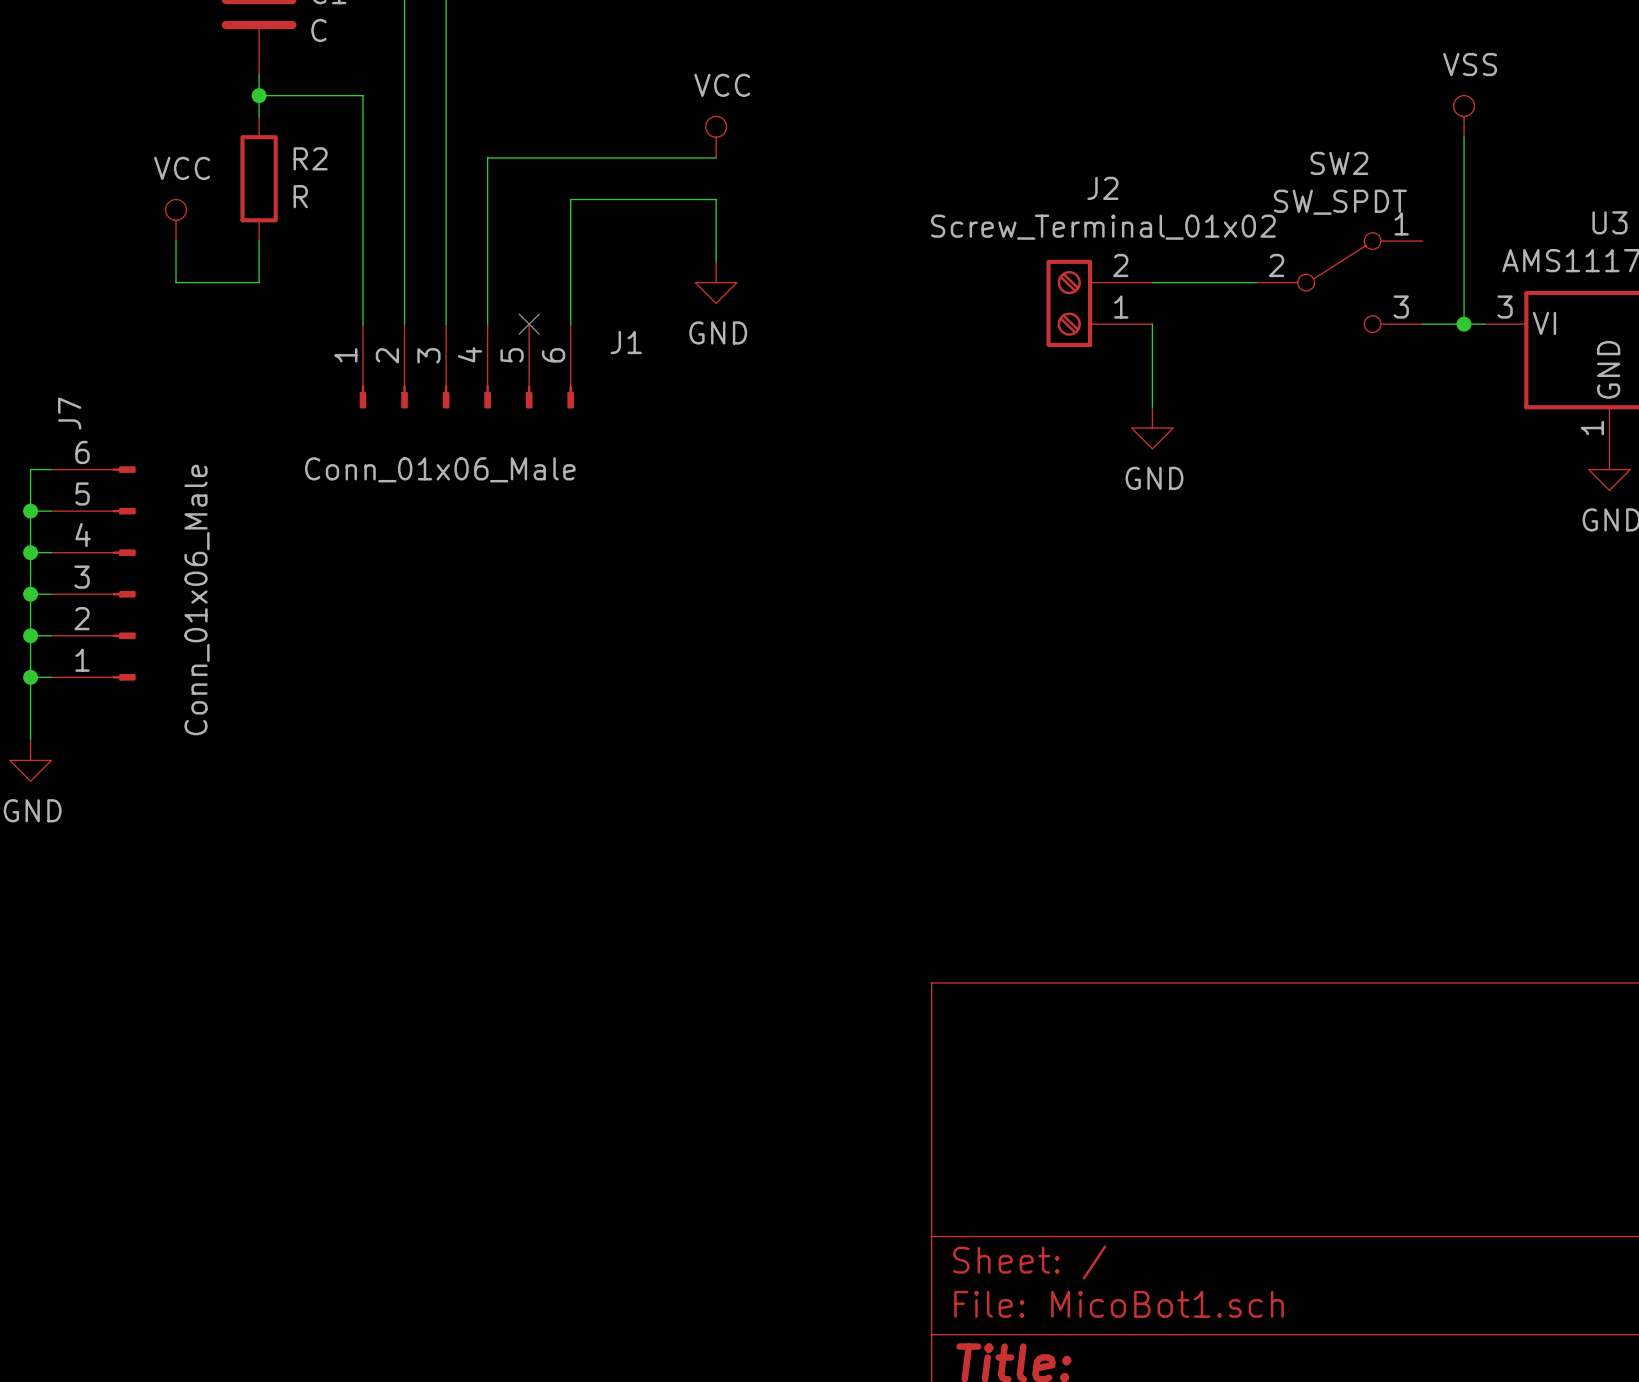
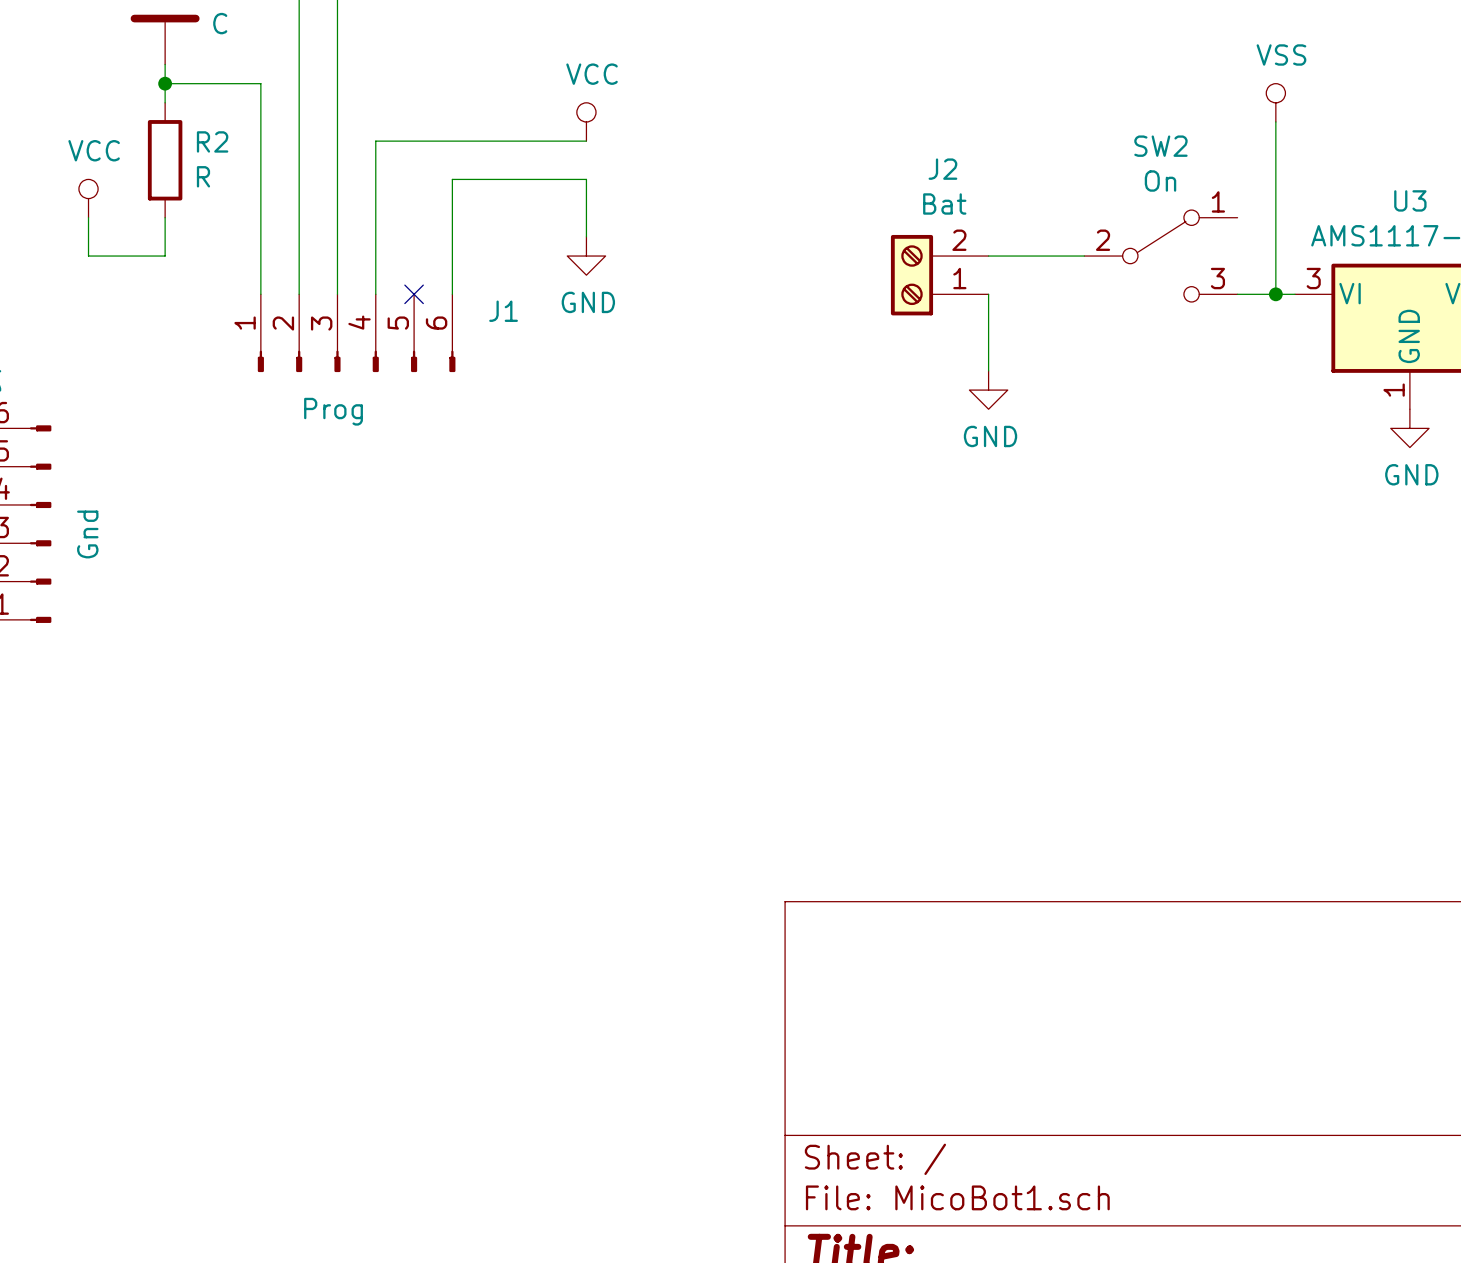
SW2 value: SW_SPDT (1340, 202) -> On (1160, 181)
J2 value: Screw_Terminal_01x02 (1103, 227) -> Bat (944, 203)
J1 value: Conn_01x06_Male (440, 469) -> Prog (333, 411)
J7 value: Conn_01x06_Male (197, 600) -> Gnd (87, 534)

